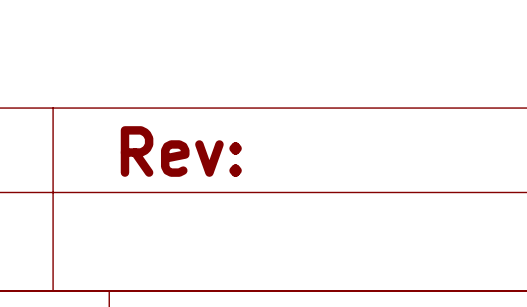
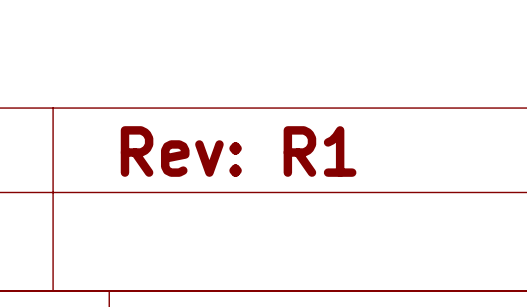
title block: Rev: (181, 151) -> Rev: R1 (238, 151)

